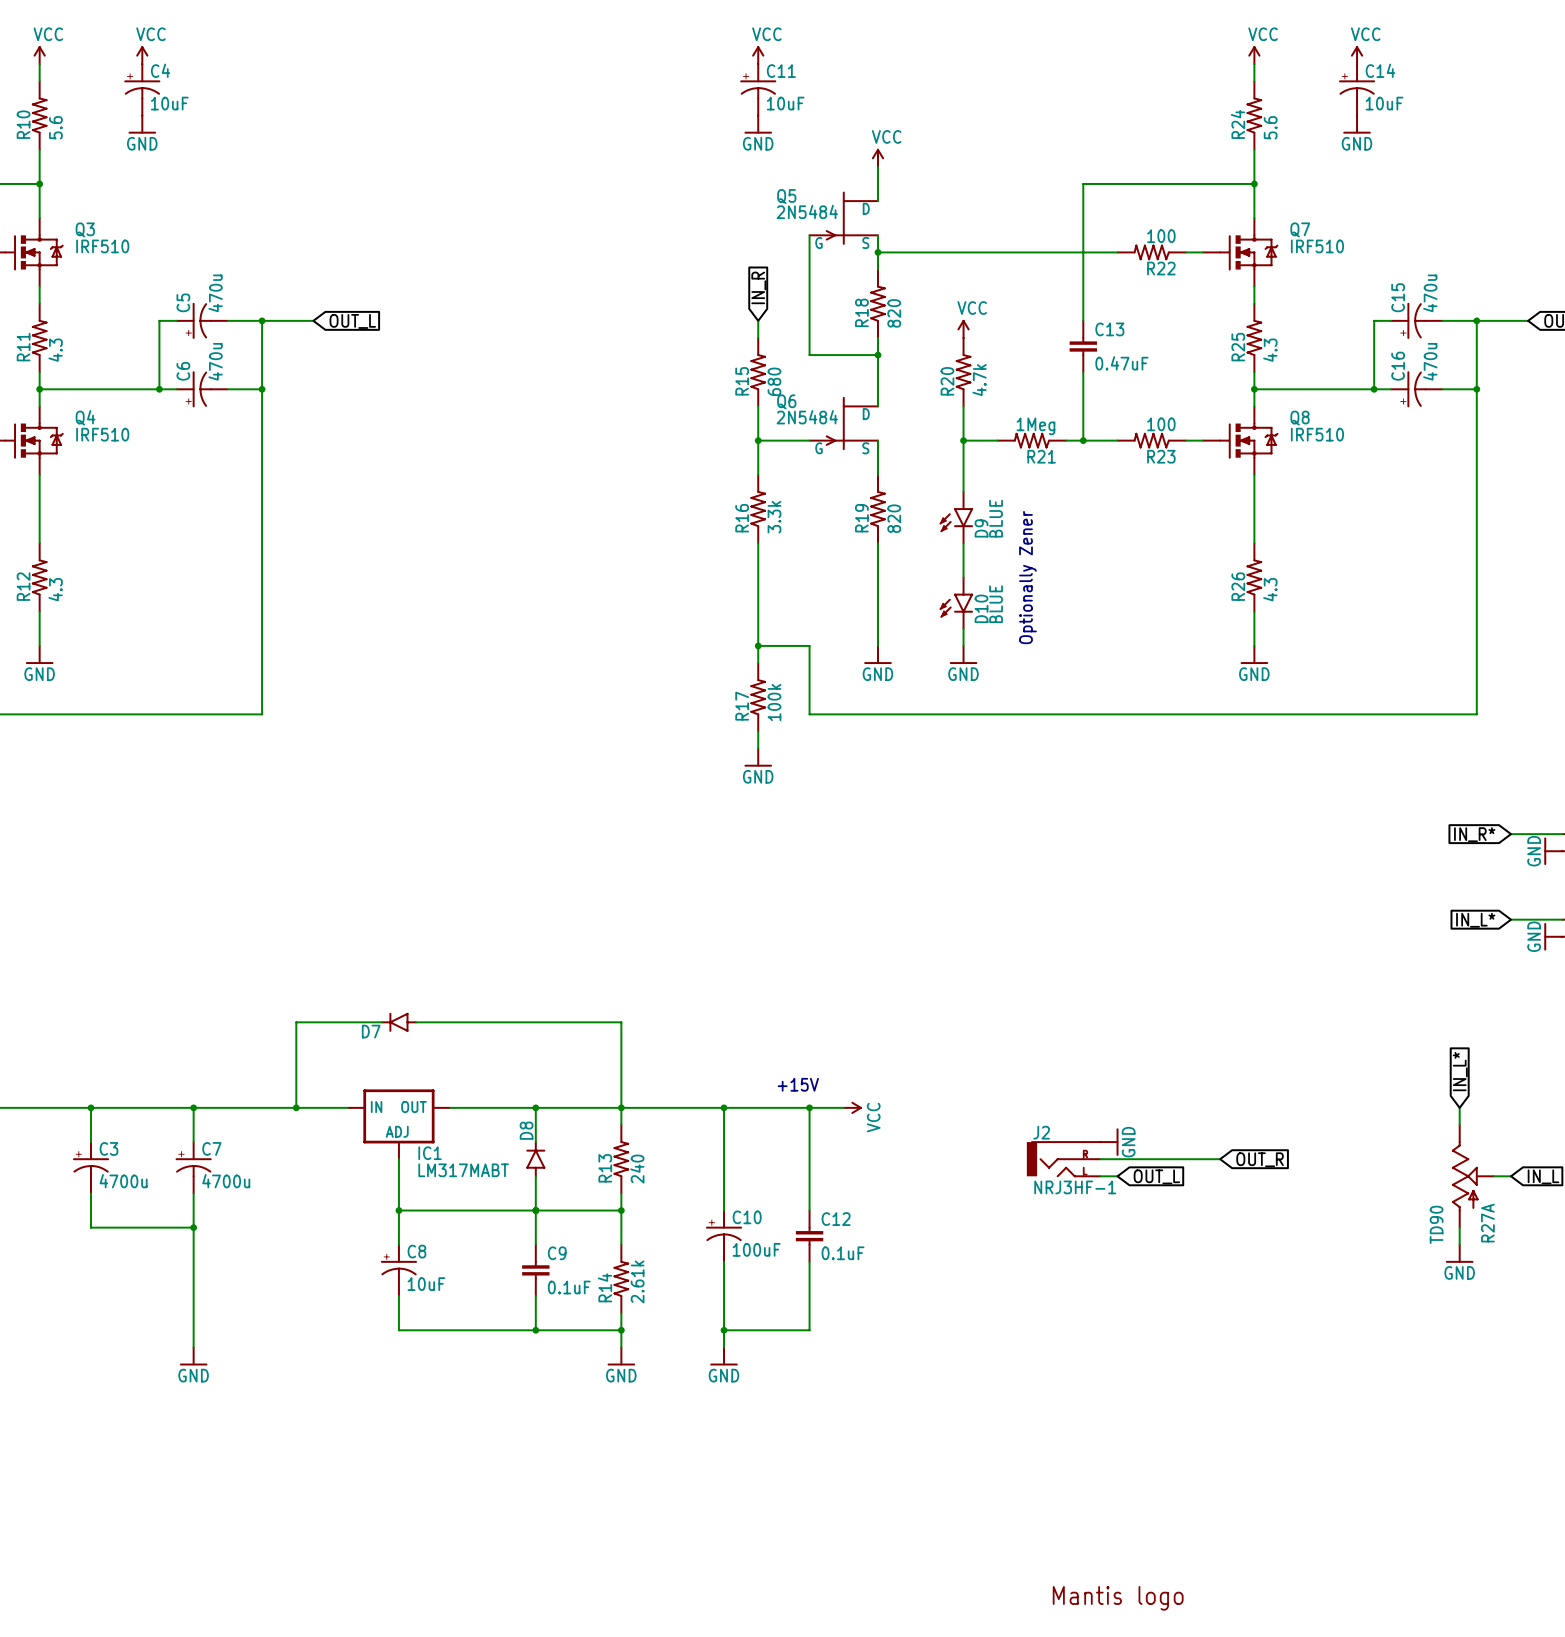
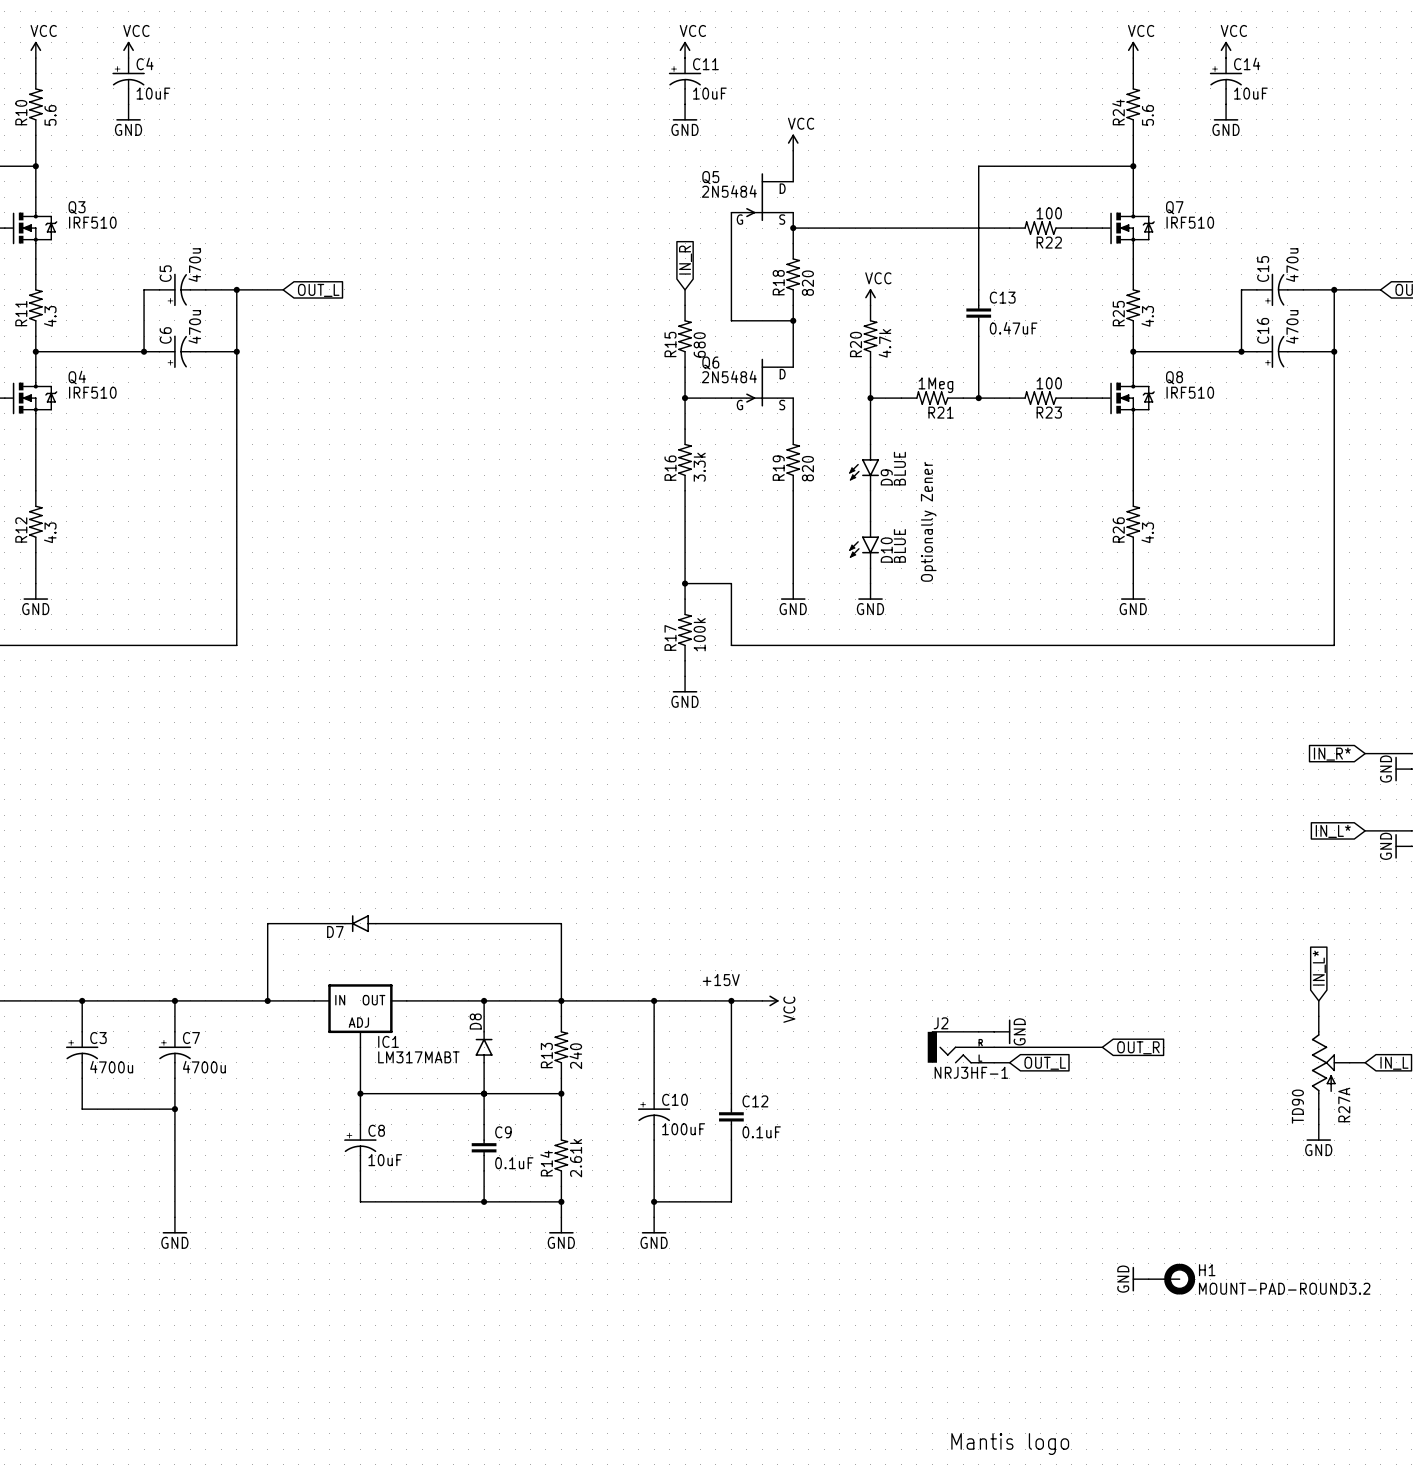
power symbol: none -> GND (1140, 1279)
wire: none -> (1148, 1279) (1164, 1279)
H1: none -> MOUNT-PAD-ROUND3.2 (1179, 1279)

